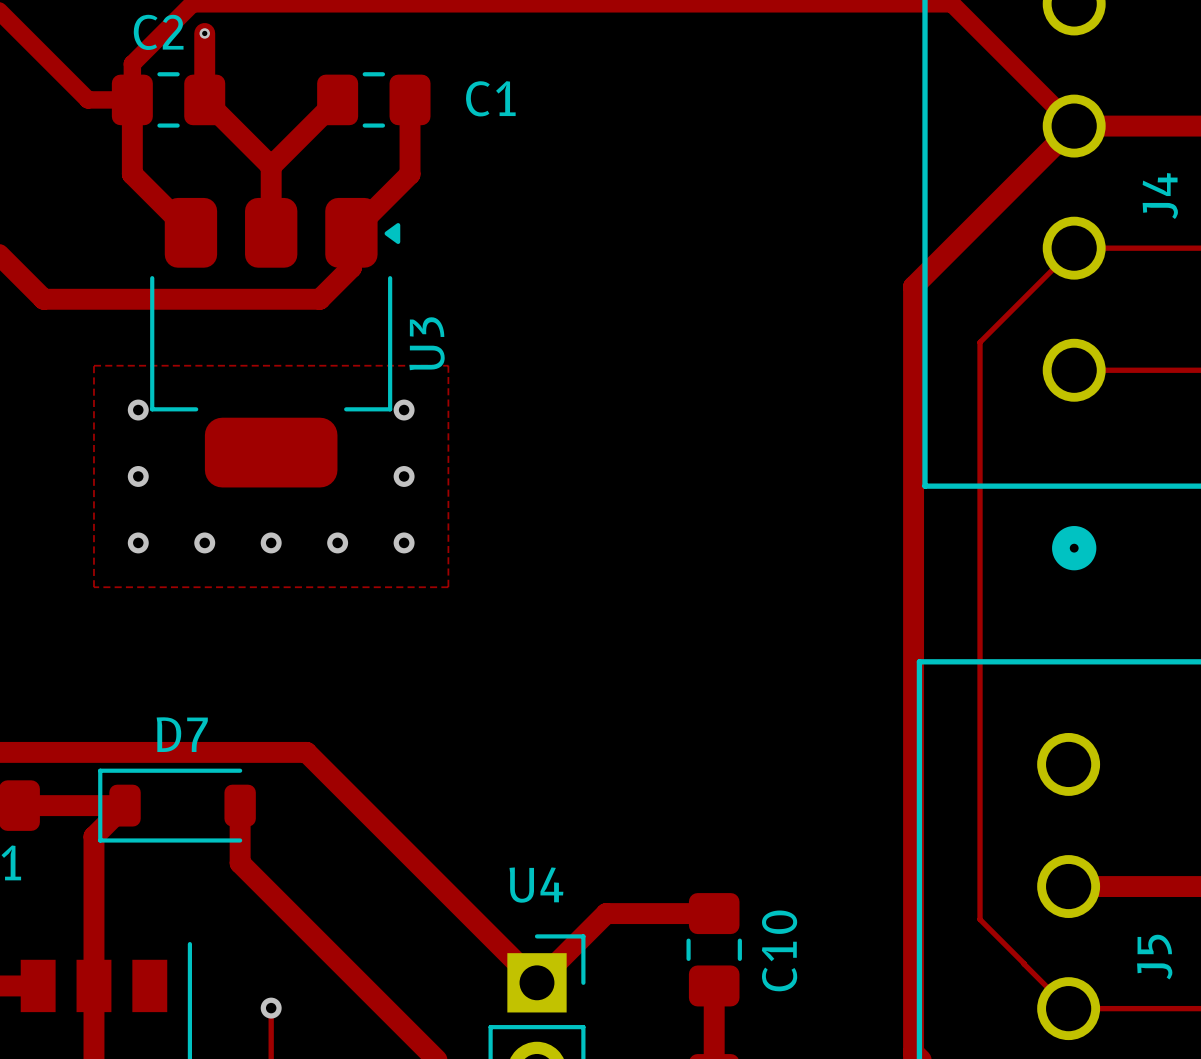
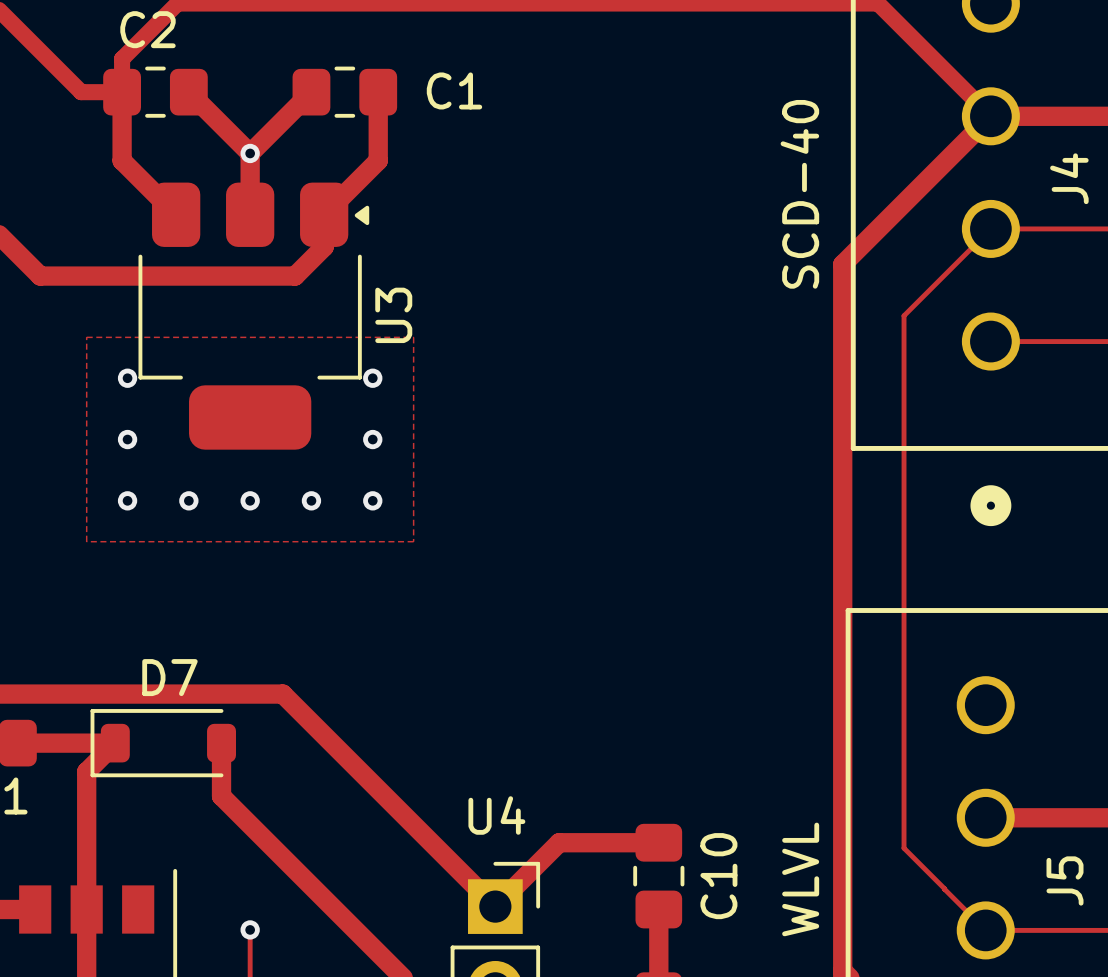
track: (204, 33) (204, 99) -> none
via: (204, 33) -> none
via: none -> (250, 153)
J4 value: none -> SCD-40 (799, 194)
J5 value: none -> WLVL (800, 879)

